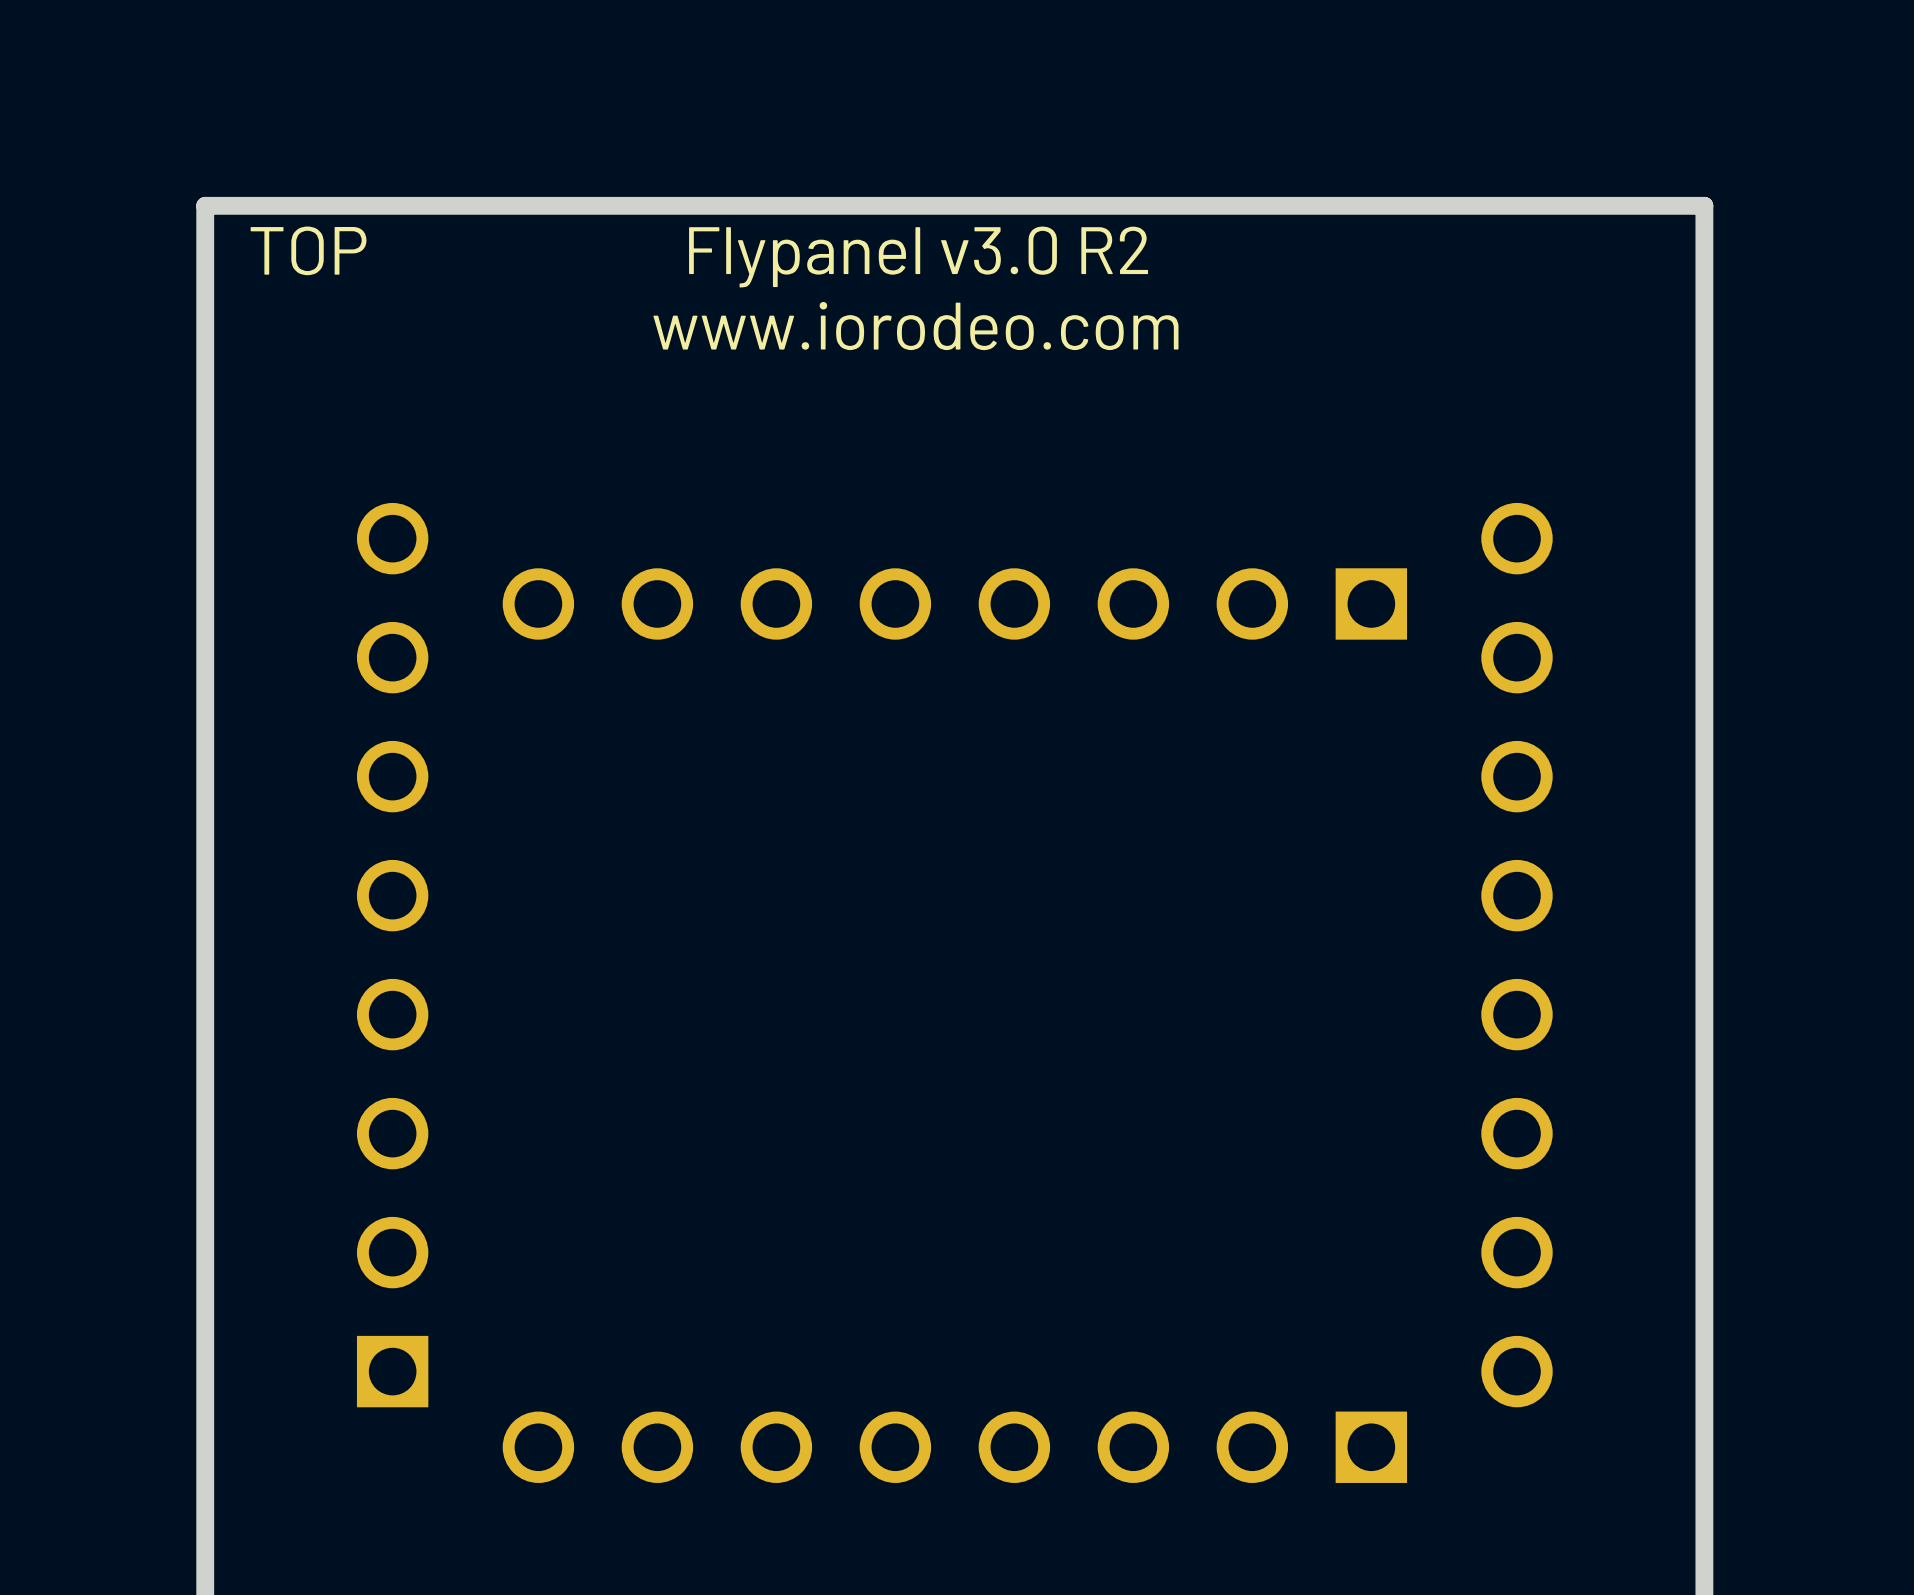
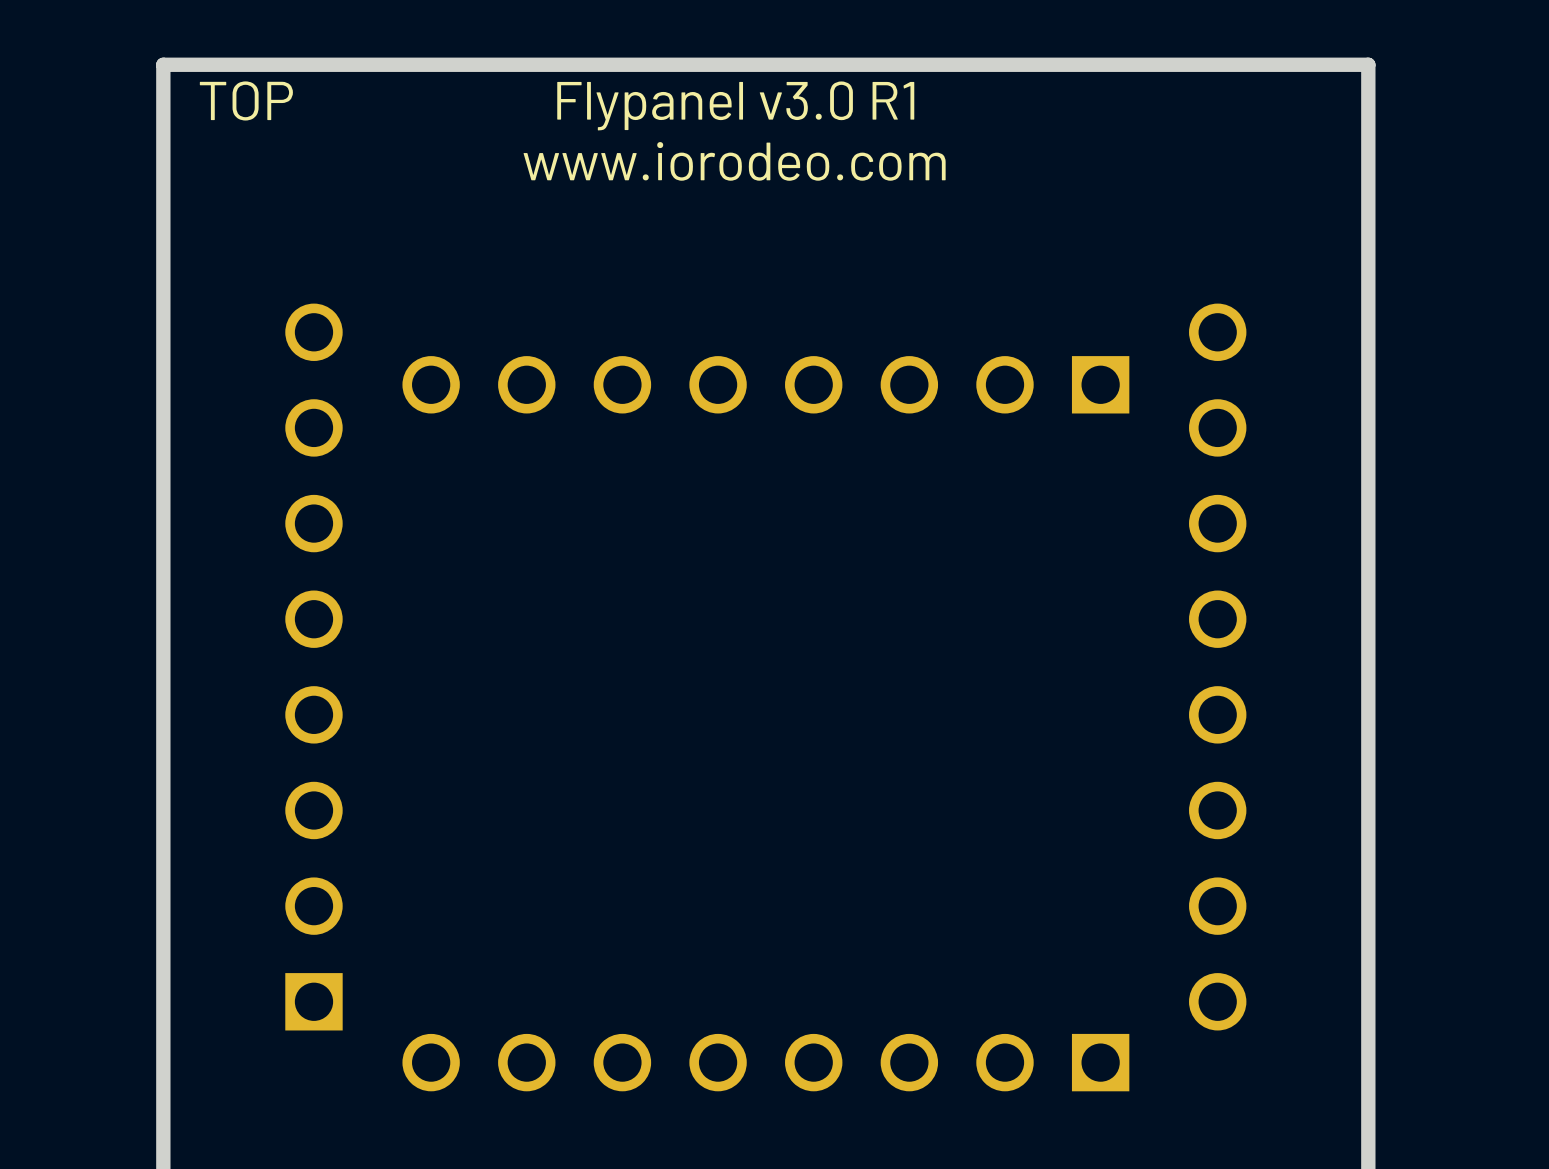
text: Flypanel v3.0 R2 (918, 257) -> Flypanel v3.0 R1 (735, 105)

